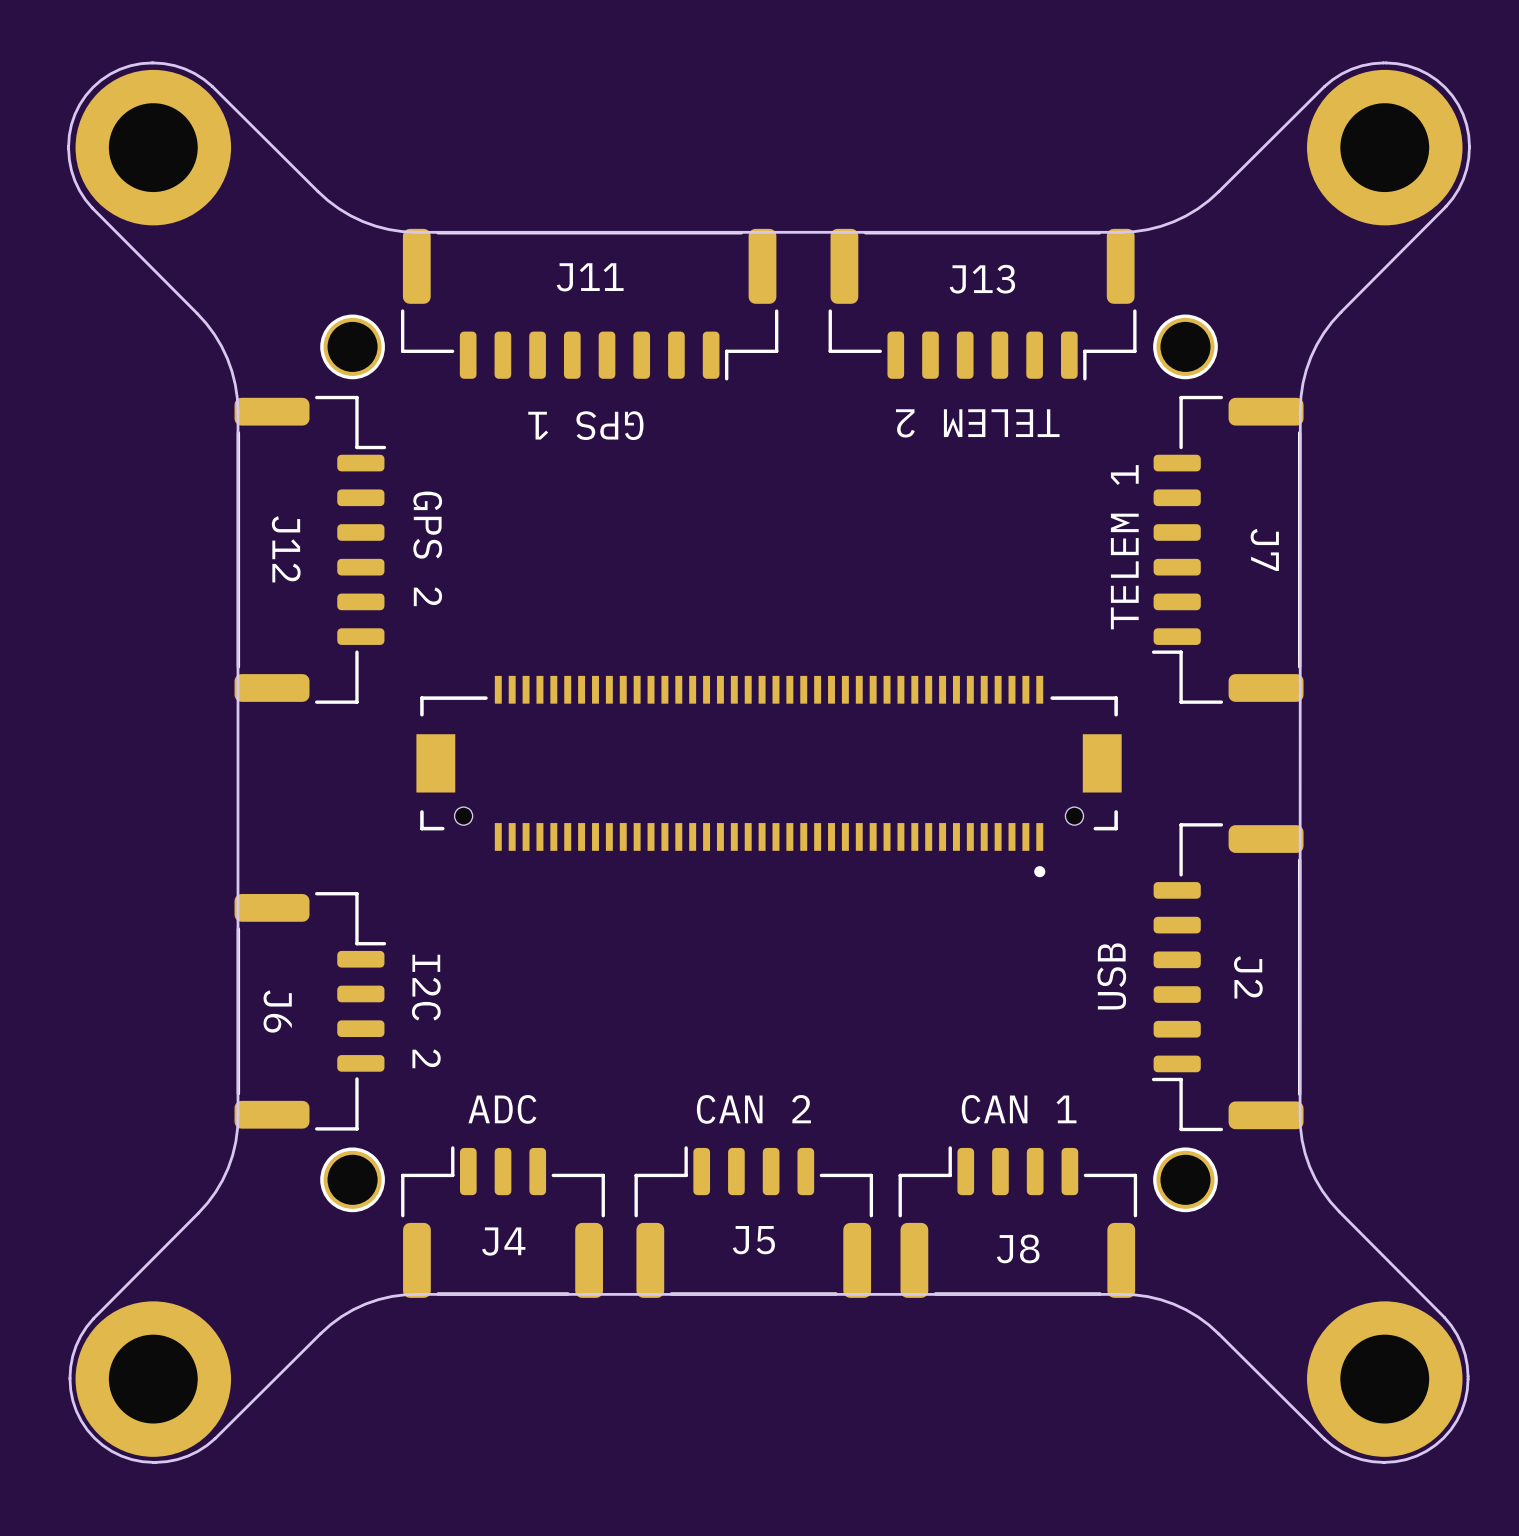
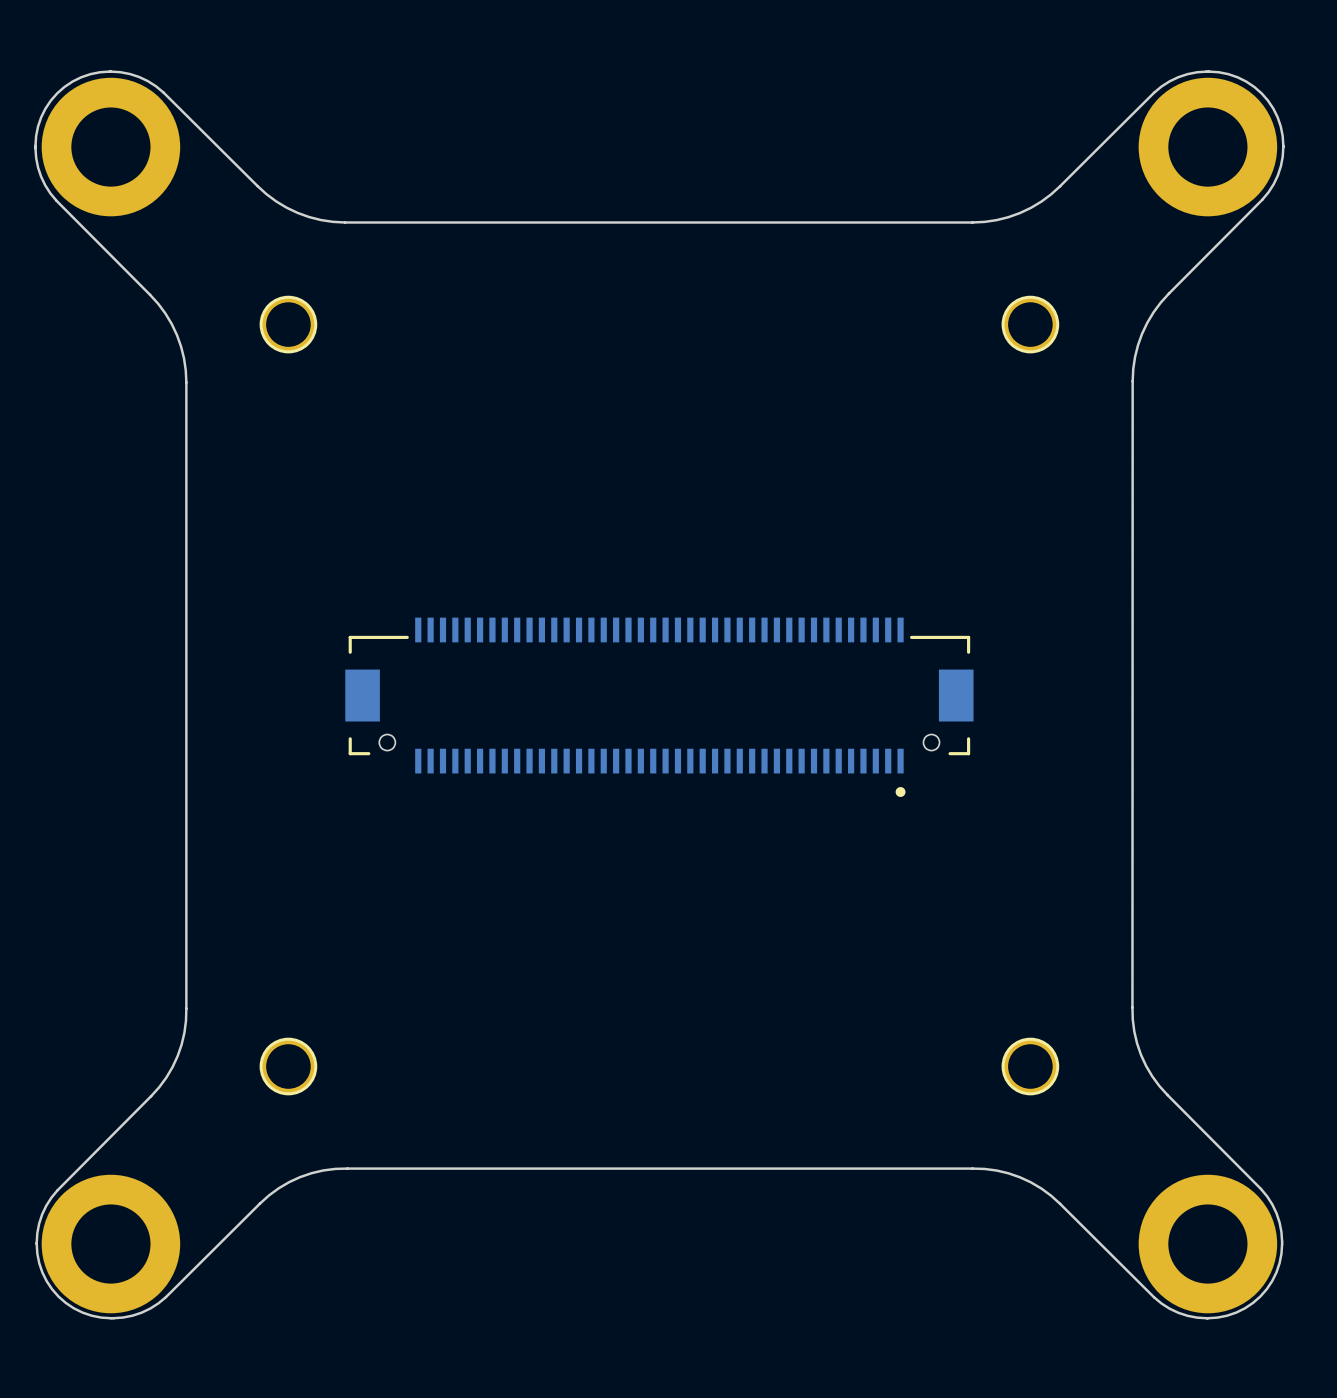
J11: (589, 304) -> none
J13: (982, 304) -> none
text: TELEM 2 (977, 423) -> none
text: GPS 1 (585, 425) -> none
text: TELEM 1 (1124, 547) -> none
text: GPS 2 (427, 548) -> none
J12: (310, 549) -> none
J7: (1227, 549) -> none
text: USB (1111, 976) -> none
J2: (1227, 977) -> none
J6: (310, 1011) -> none
text: I2C 2 (426, 1011) -> none
text: ADC (502, 1109) -> none
text: CAN 2 (753, 1109) -> none
text: CAN 1 (1019, 1109) -> none
J4: (503, 1222) -> none
J5: (753, 1222) -> none
J8: (1017, 1222) -> none

